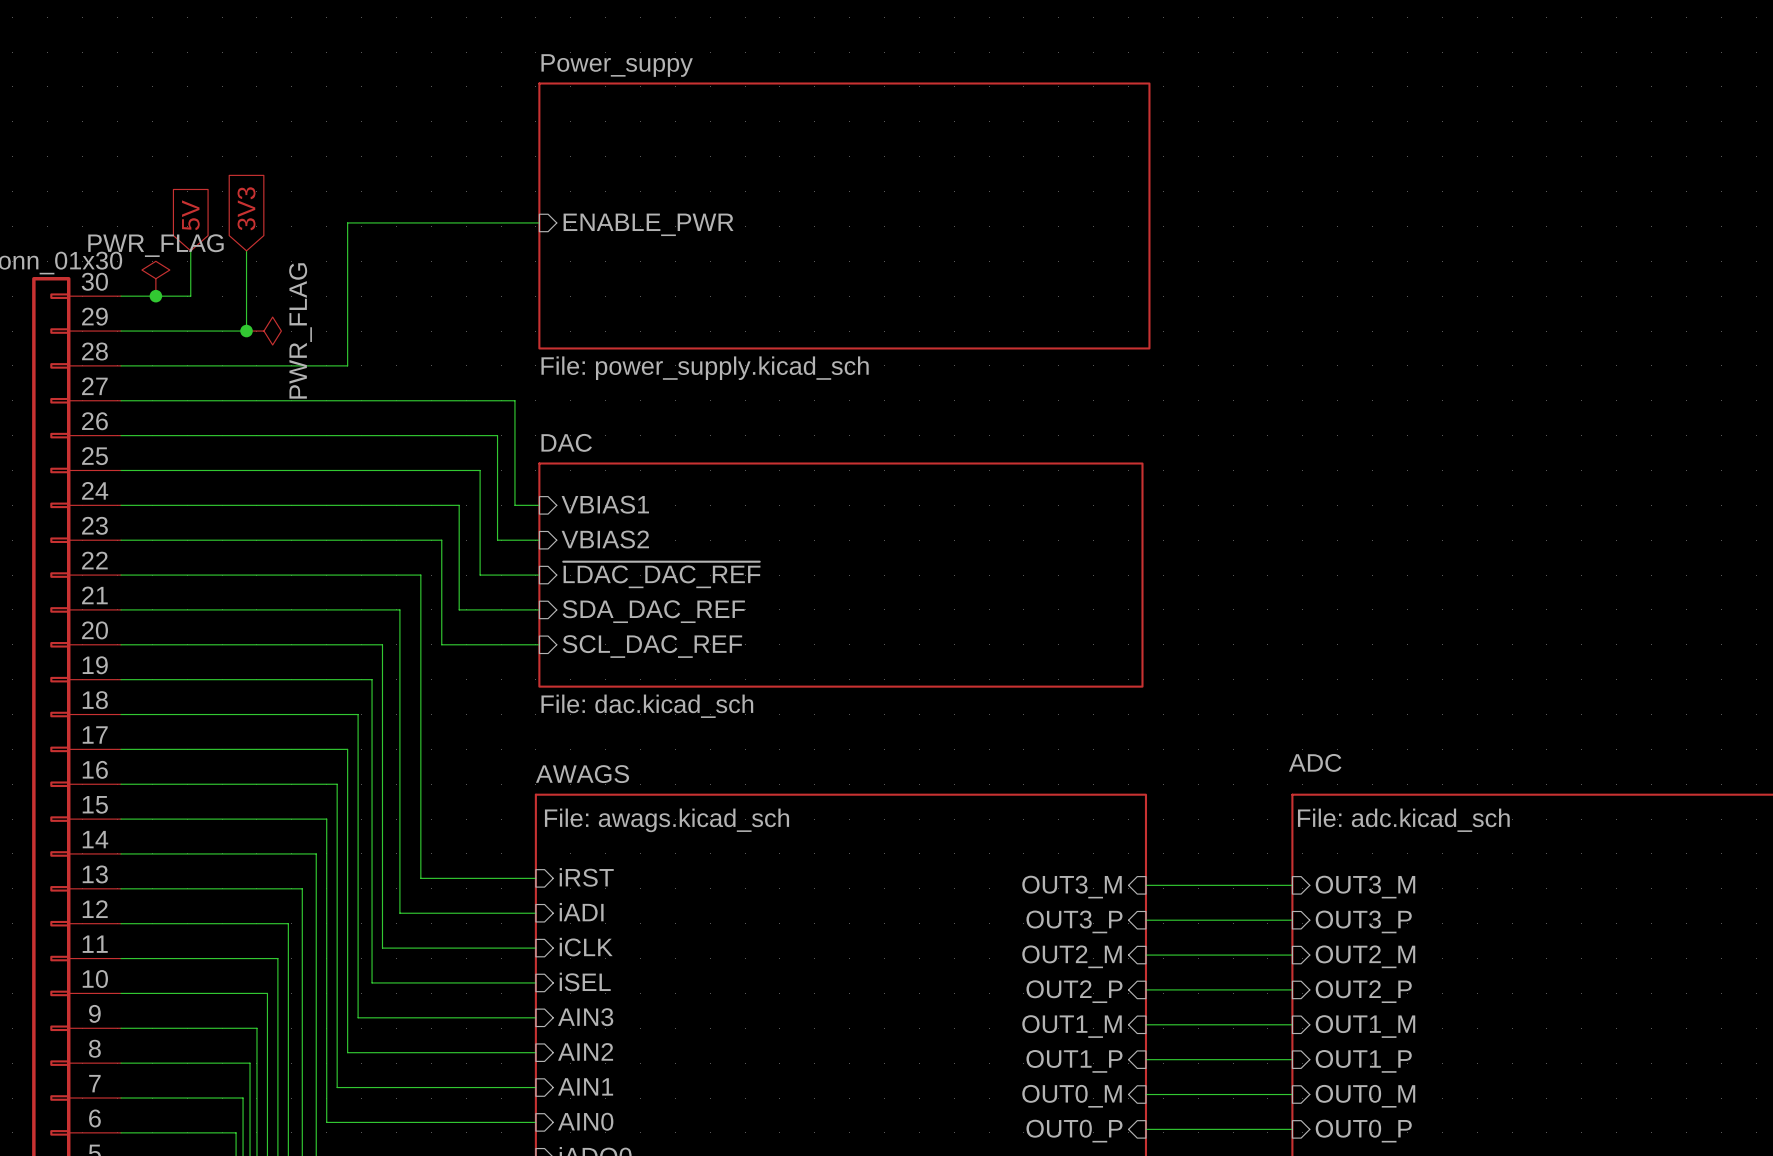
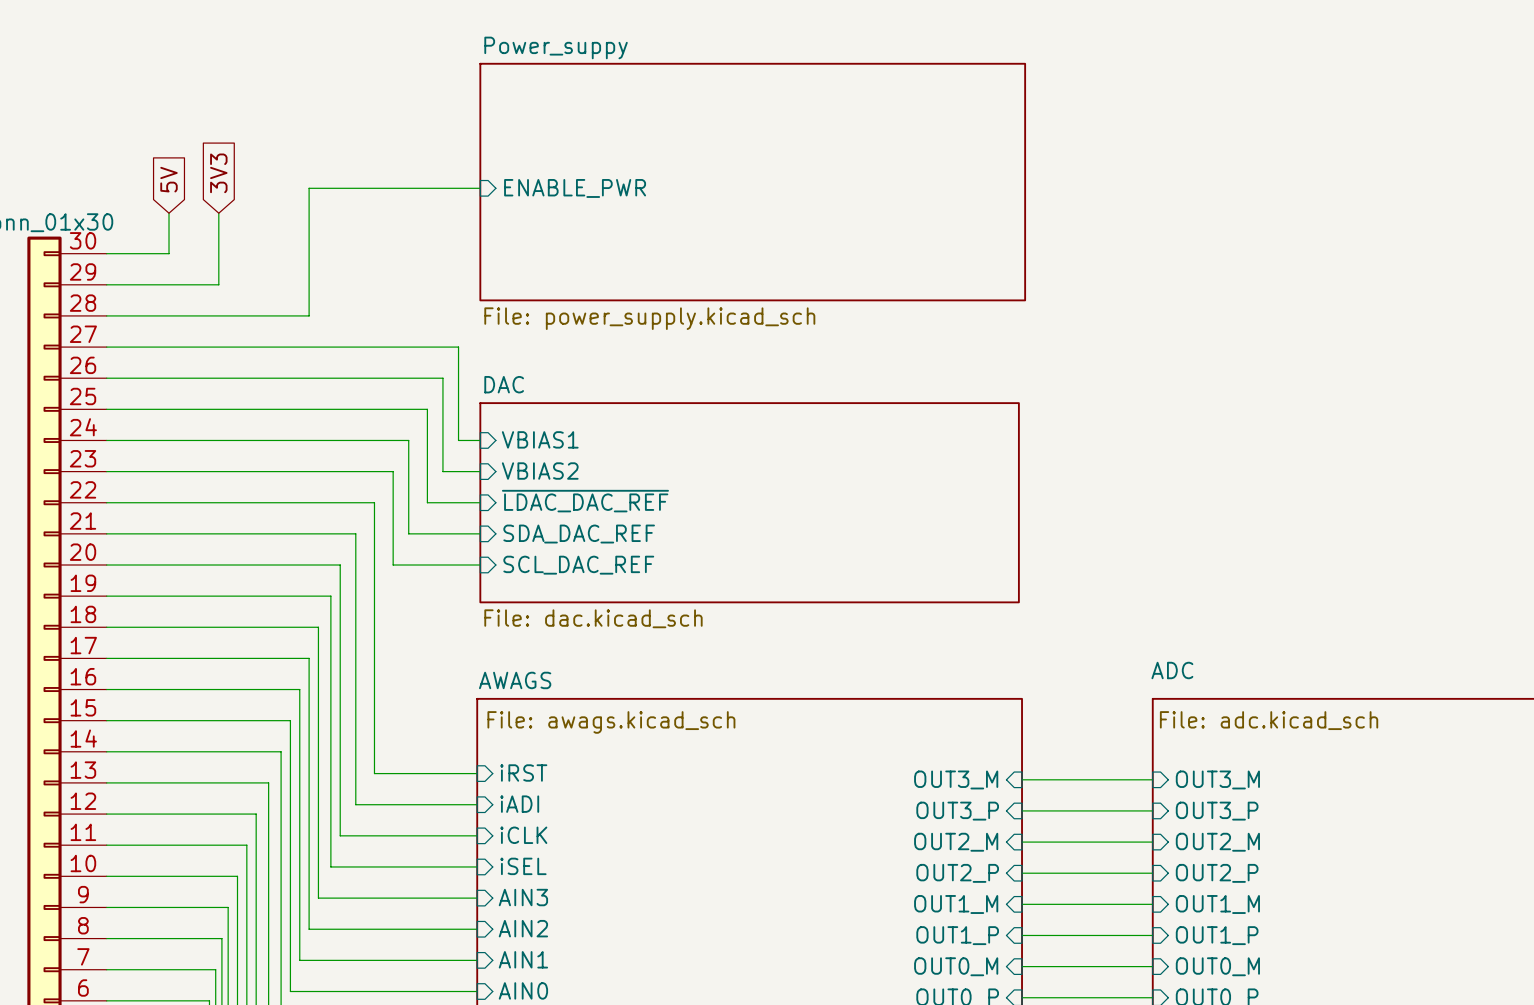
power symbol: PWR_FLAG (155, 278) -> none
junction: (155, 296) -> none
junction: (246, 331) -> none
power symbol: PWR_FLAG (263, 331) -> none

